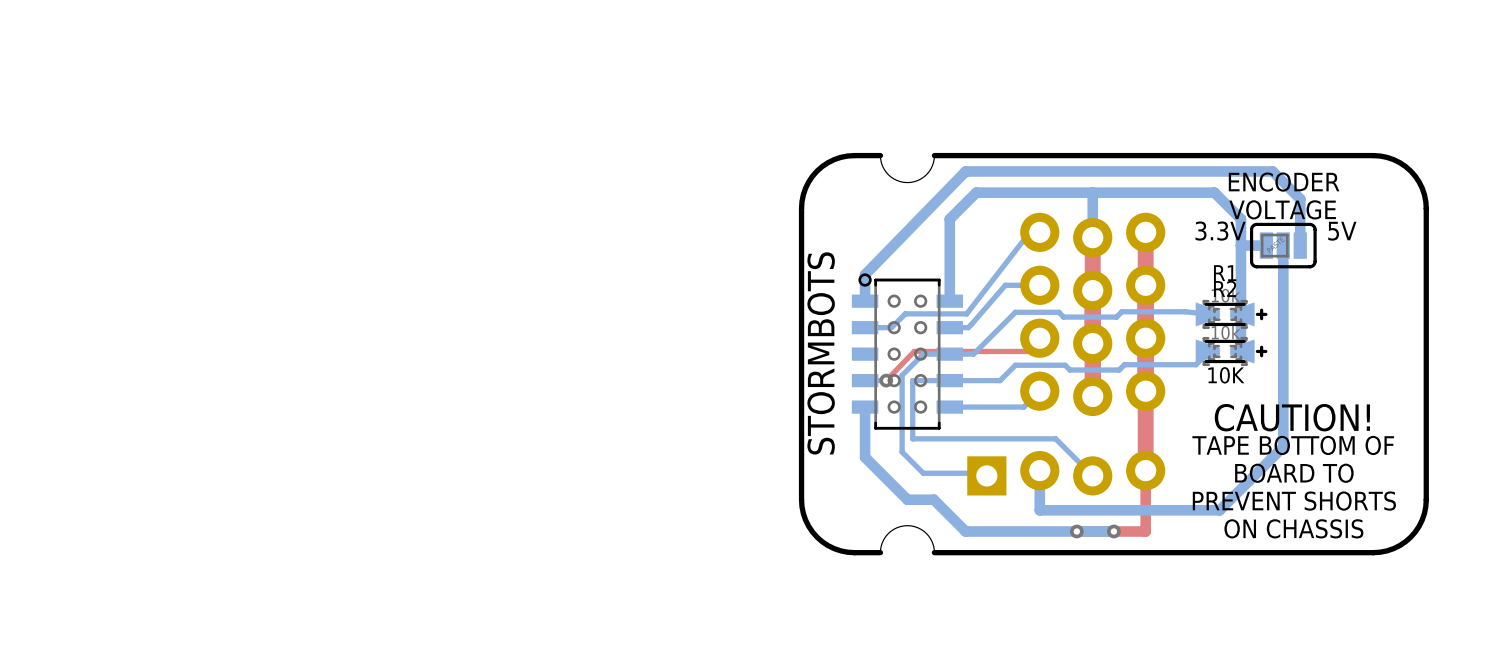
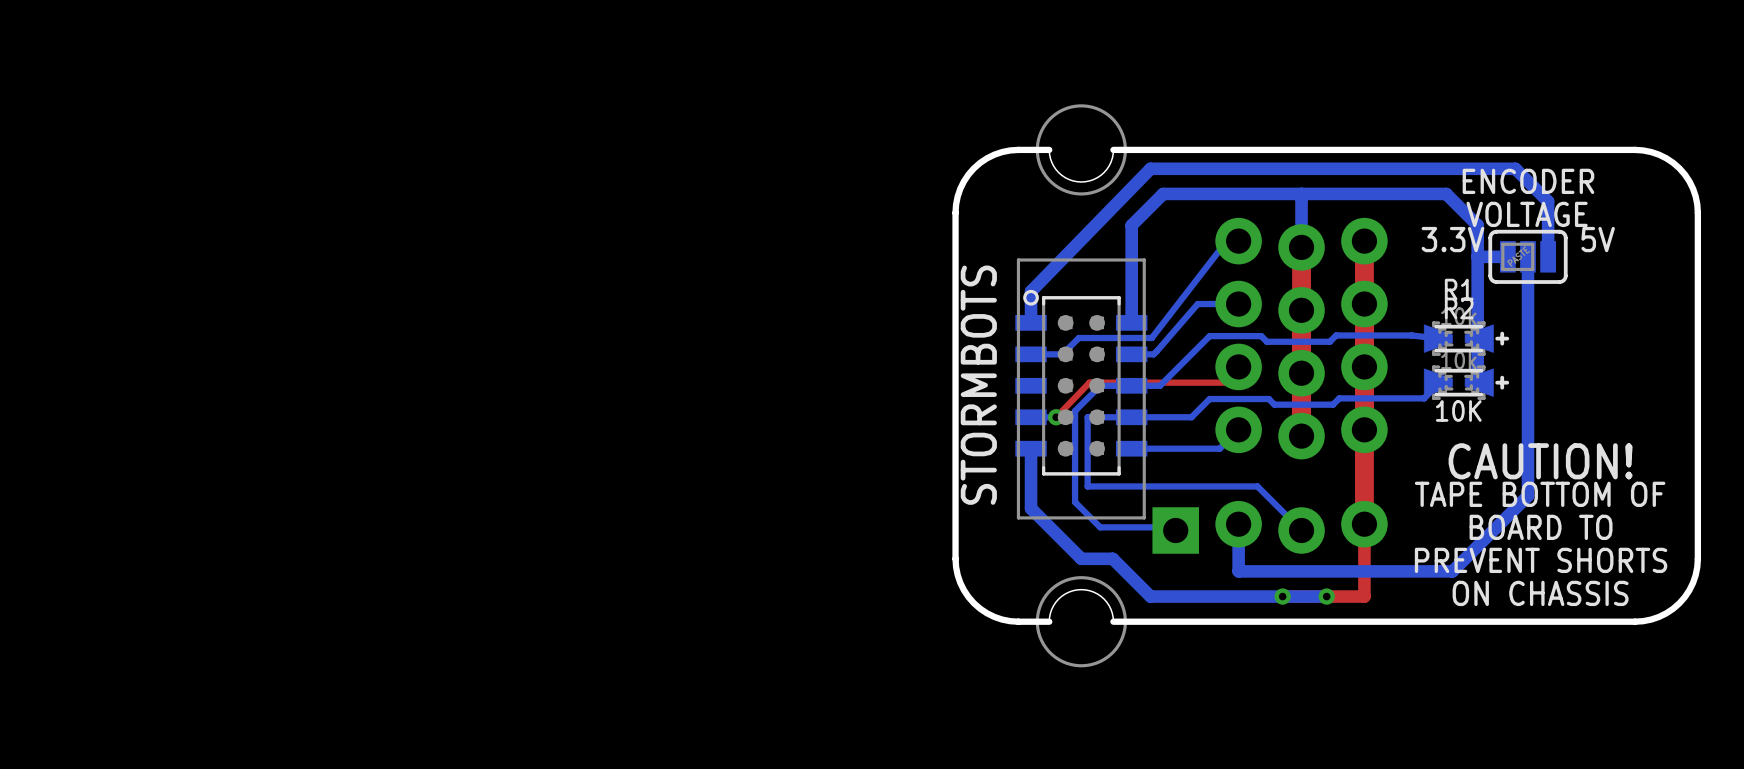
drawing: none -> [1016, 104, 1146, 668]

